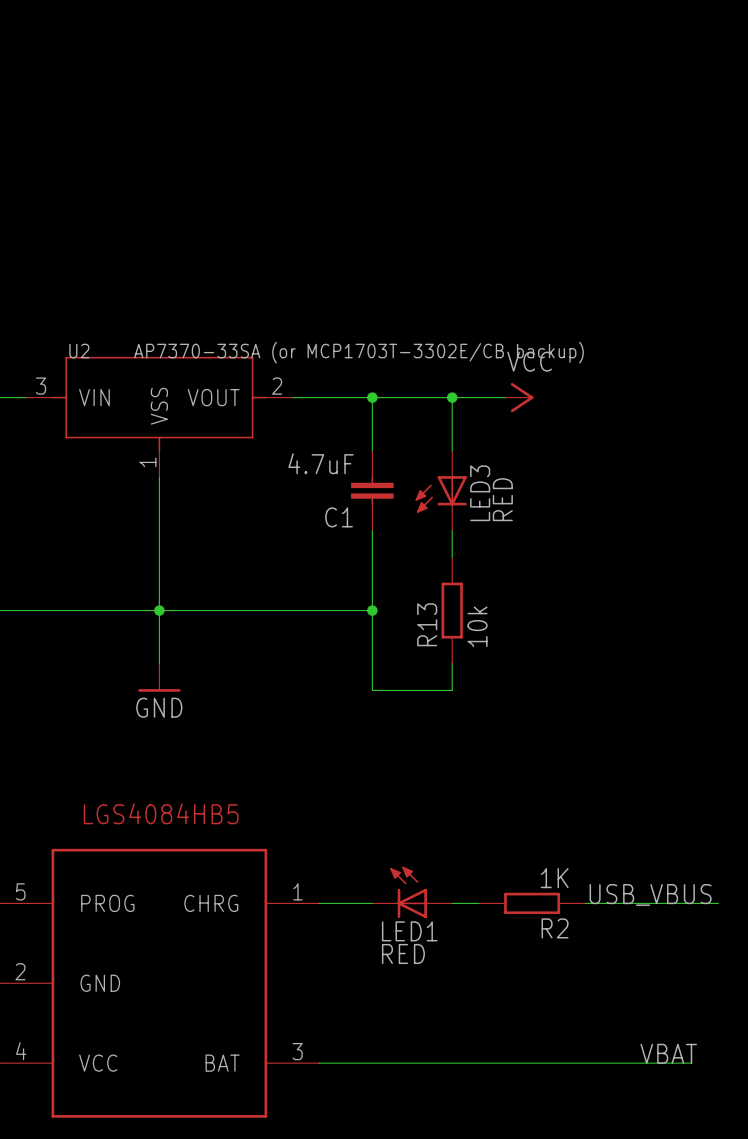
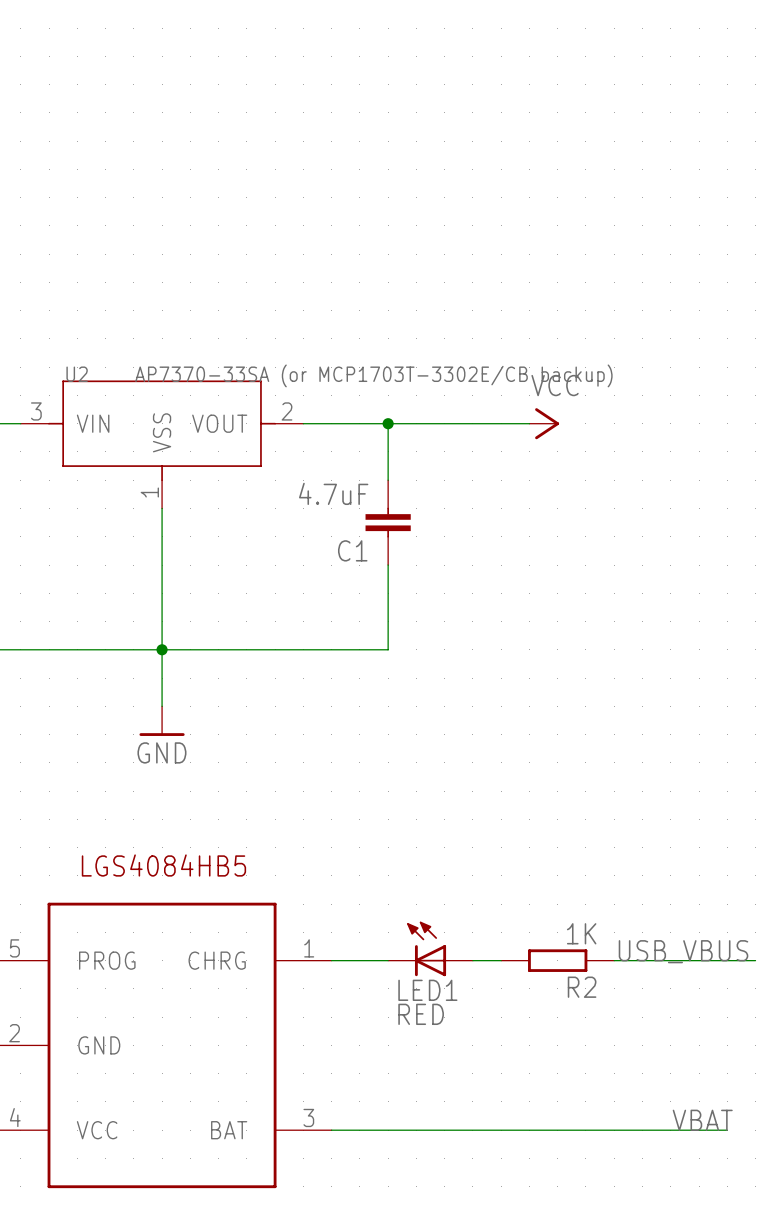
wire: (452, 397) (452, 450) -> none
junction: (452, 397) -> none
LED3: RED (441, 490) -> none
wire: (452, 530) (452, 557) -> none
wire: (372, 610) (372, 690) (452, 690) (452, 663) -> none
junction: (372, 610) -> none
R13: 10k (452, 610) -> none

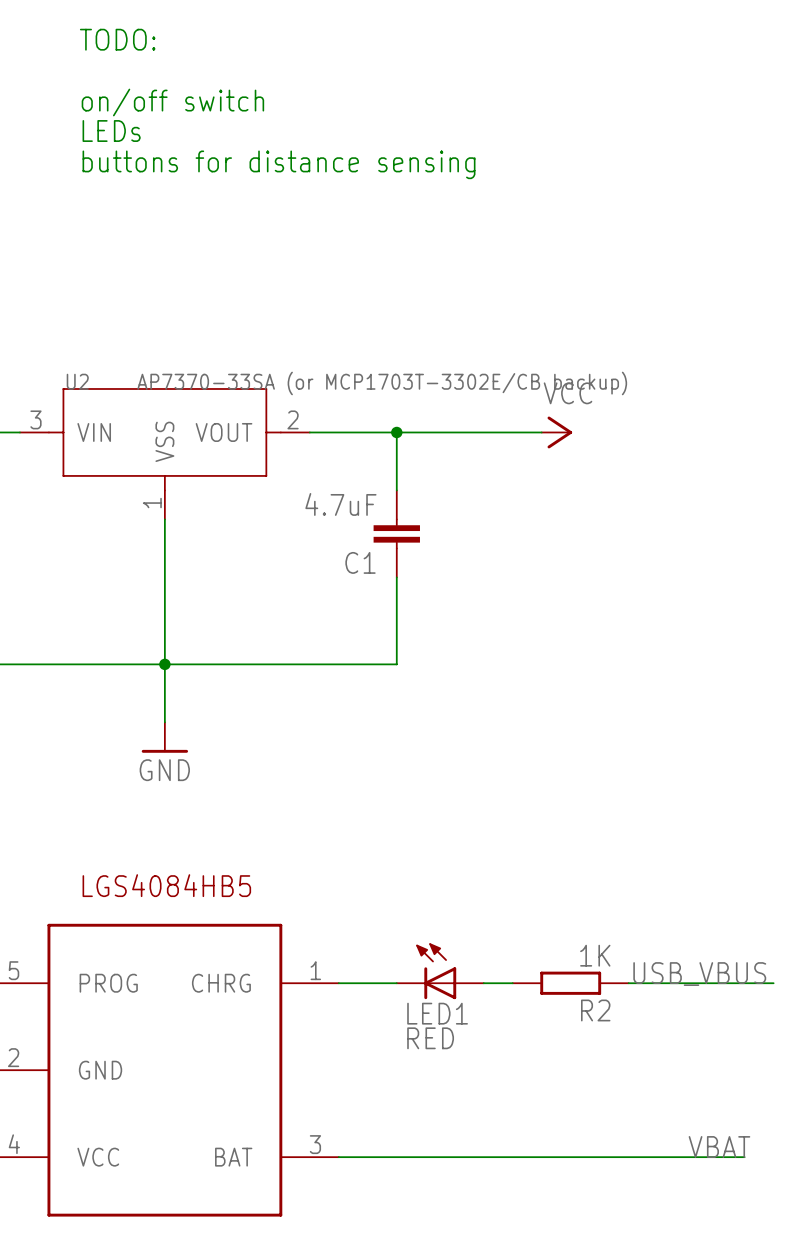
text: none -> TODO: (117, 39)
text: none -> on/off switch (172, 102)
text: none -> LEDs (111, 131)
text: none -> buttons for distance sensing (279, 164)

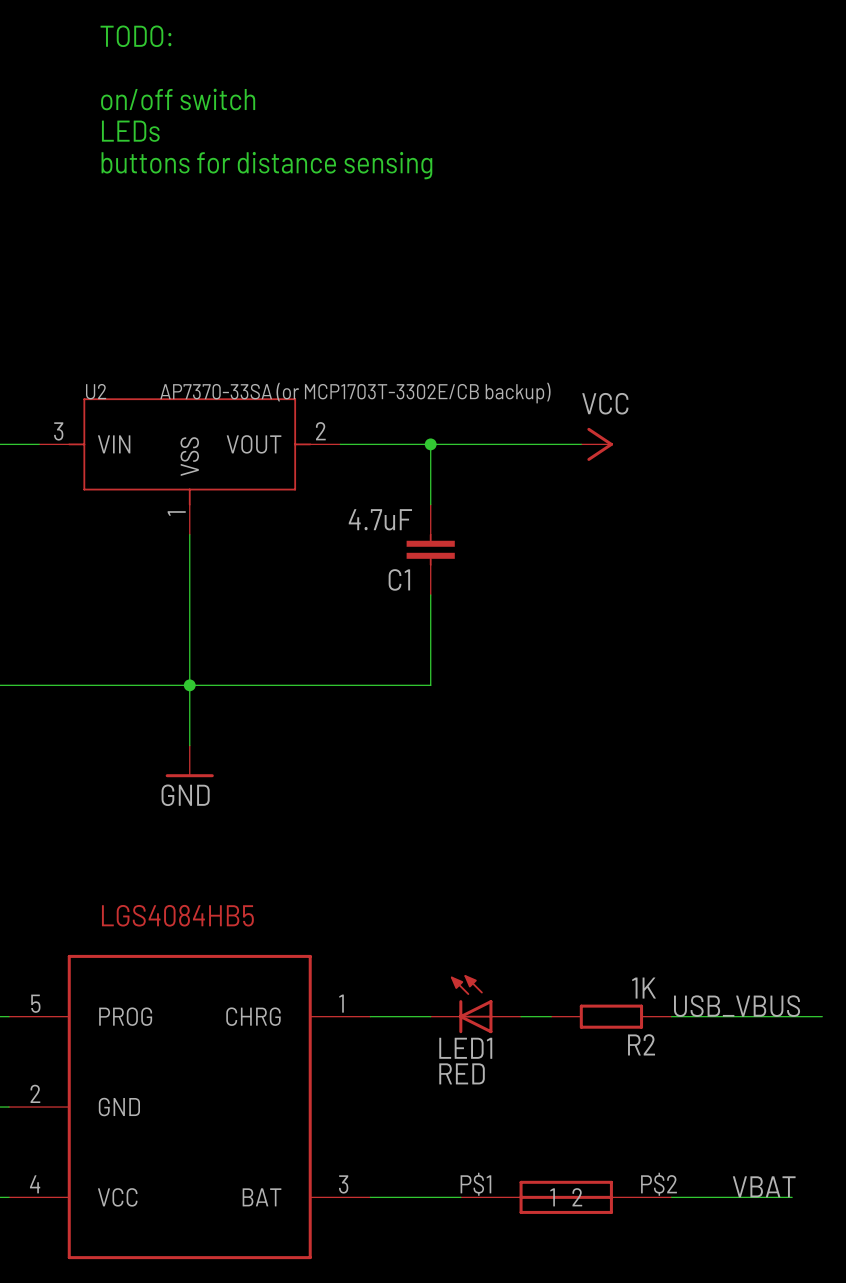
part: none -> (566, 1197)

